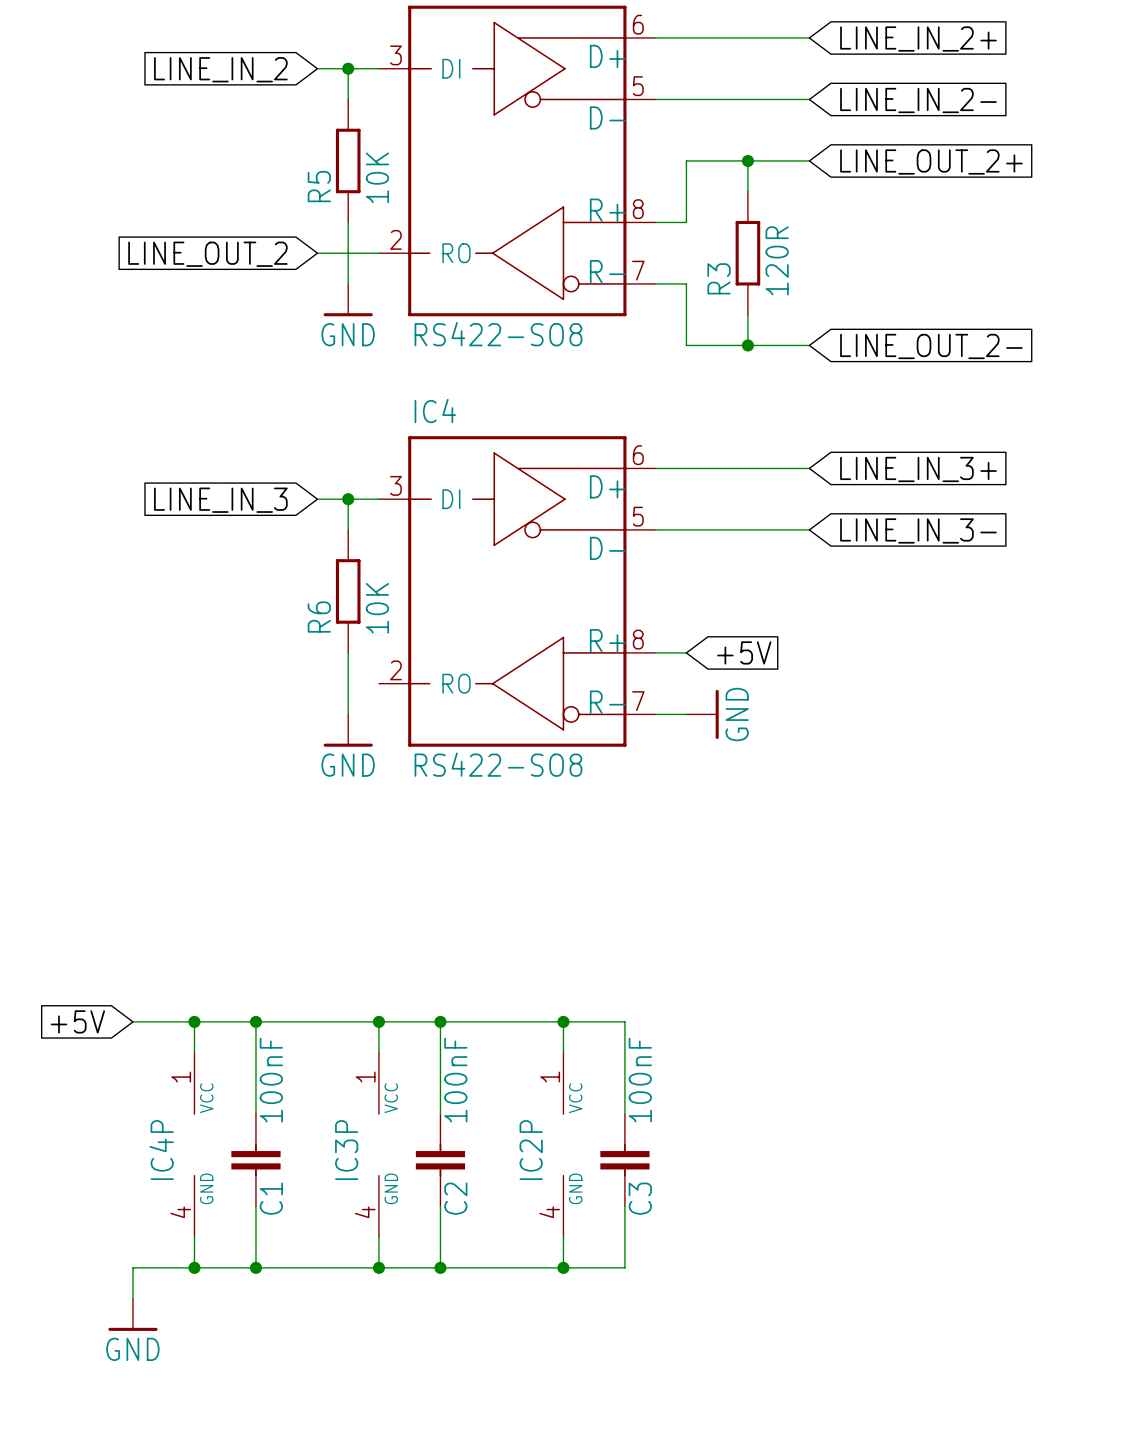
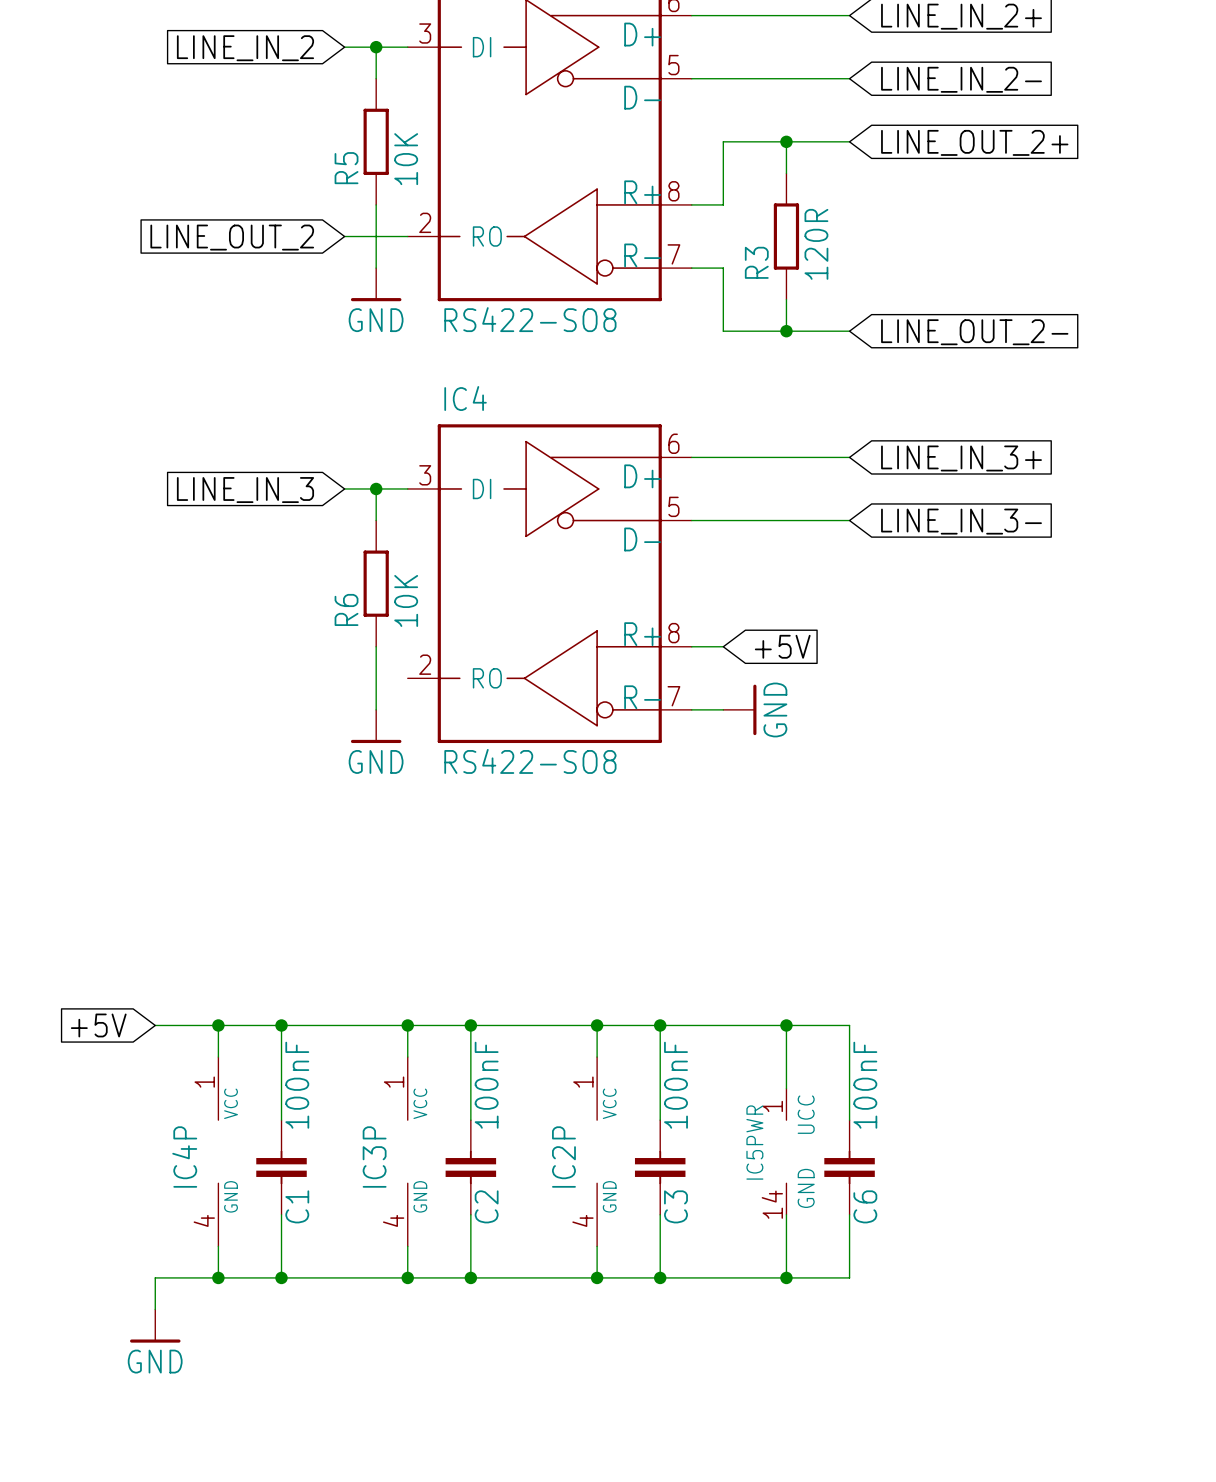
wire: none -> (660, 1025) (849, 1025) (849, 1120)
junction: none -> (660, 1025)
wire: none -> (786, 1025) (786, 1088)
junction: none -> (786, 1025)
IC5PWR: none -> (786, 1151)
C6: none -> 100nF (849, 1167)
wire: none -> (786, 1214) (786, 1277)
wire: none -> (849, 1214) (849, 1277) (660, 1277)
junction: none -> (660, 1277)
junction: none -> (786, 1277)

